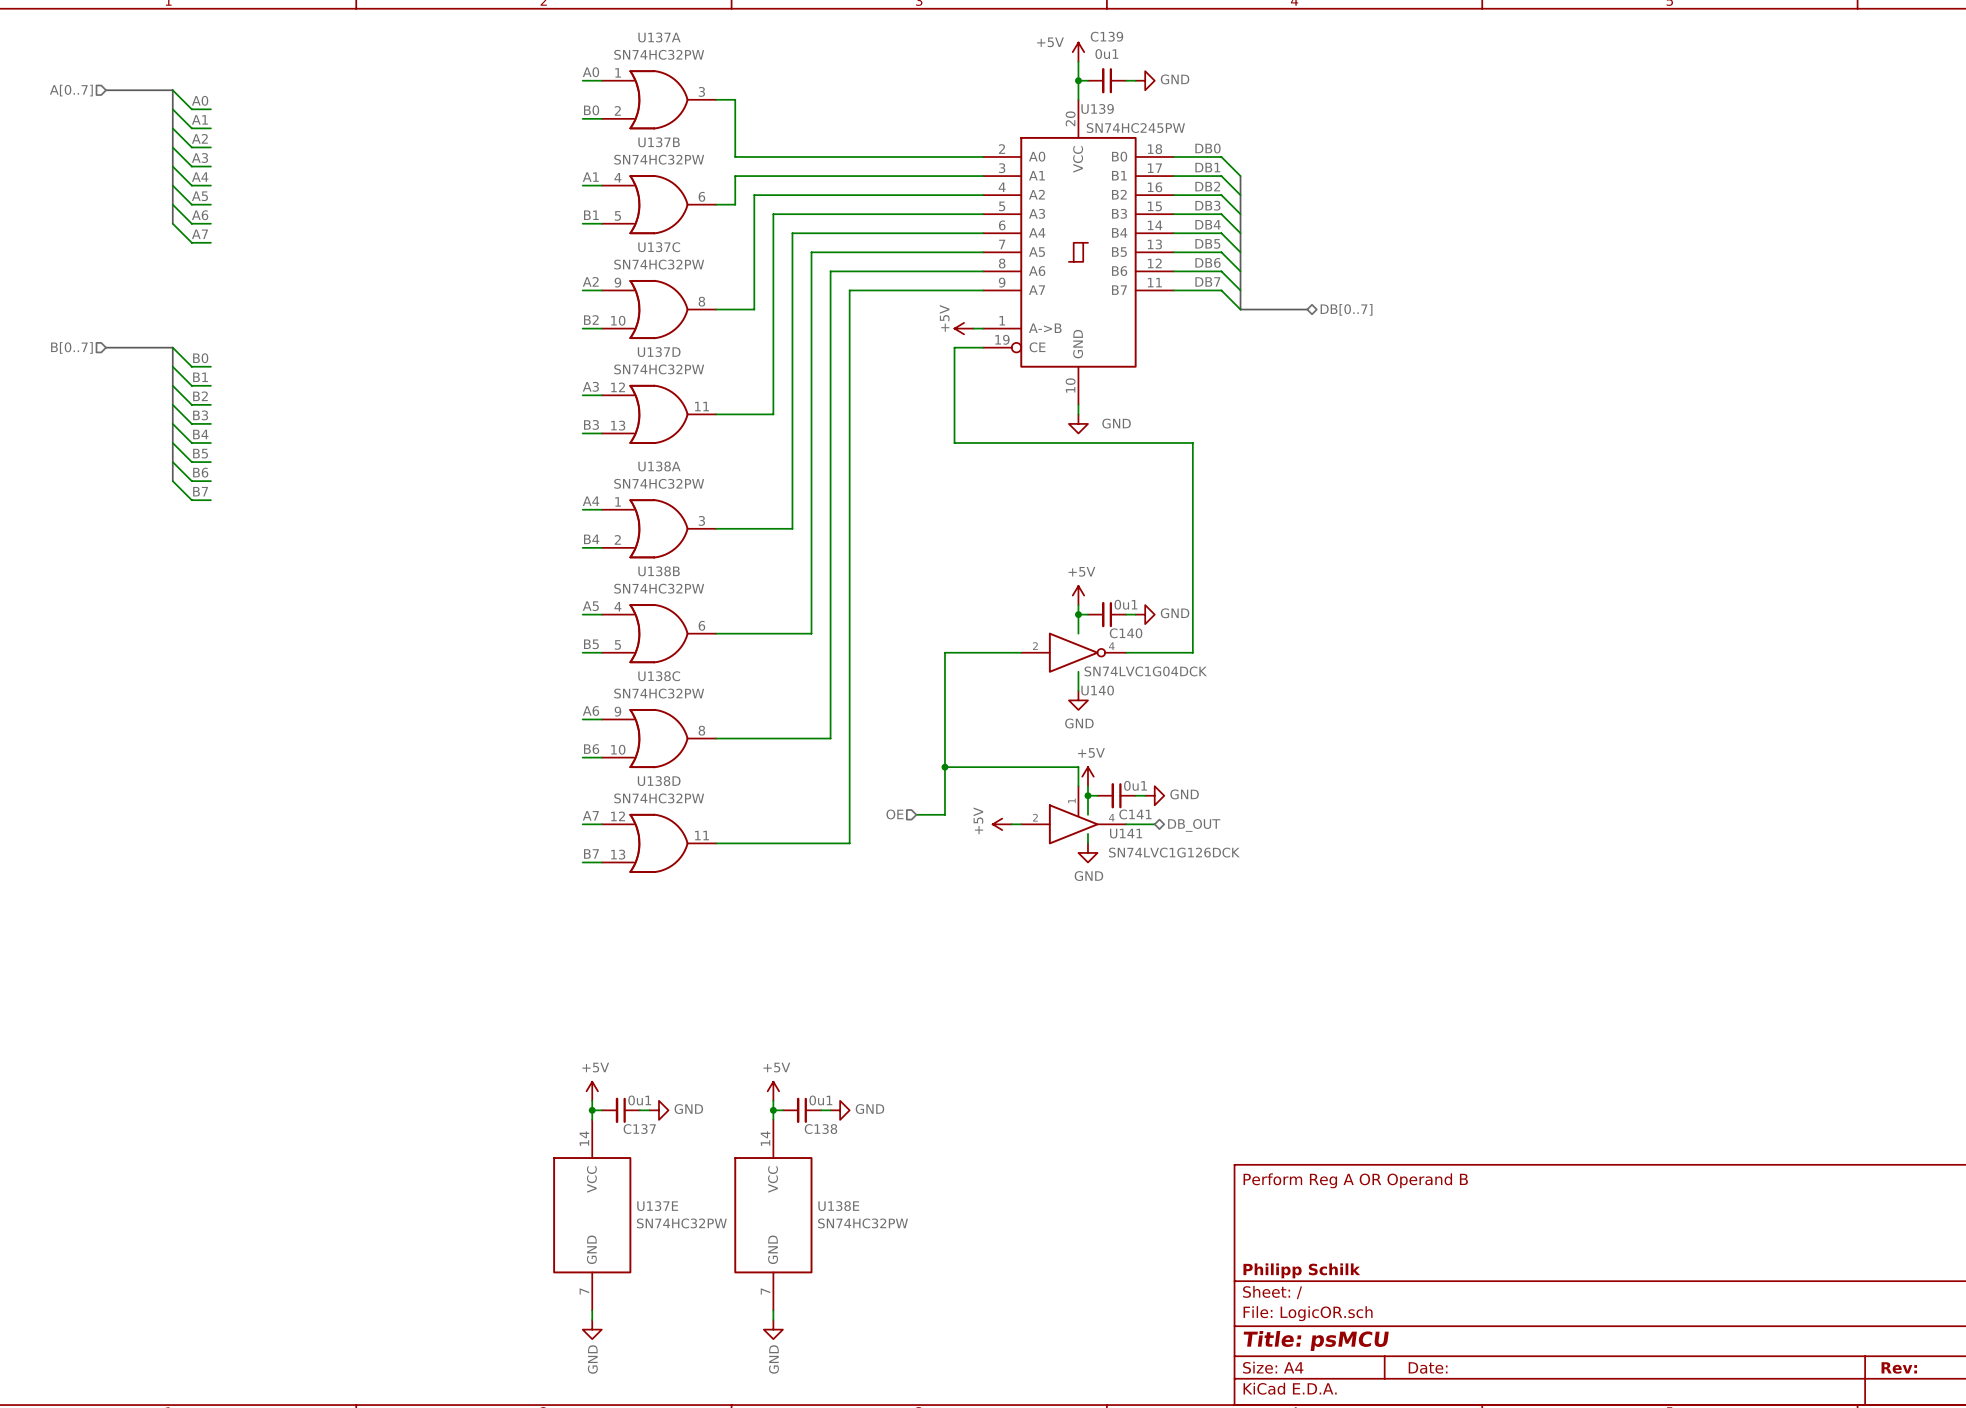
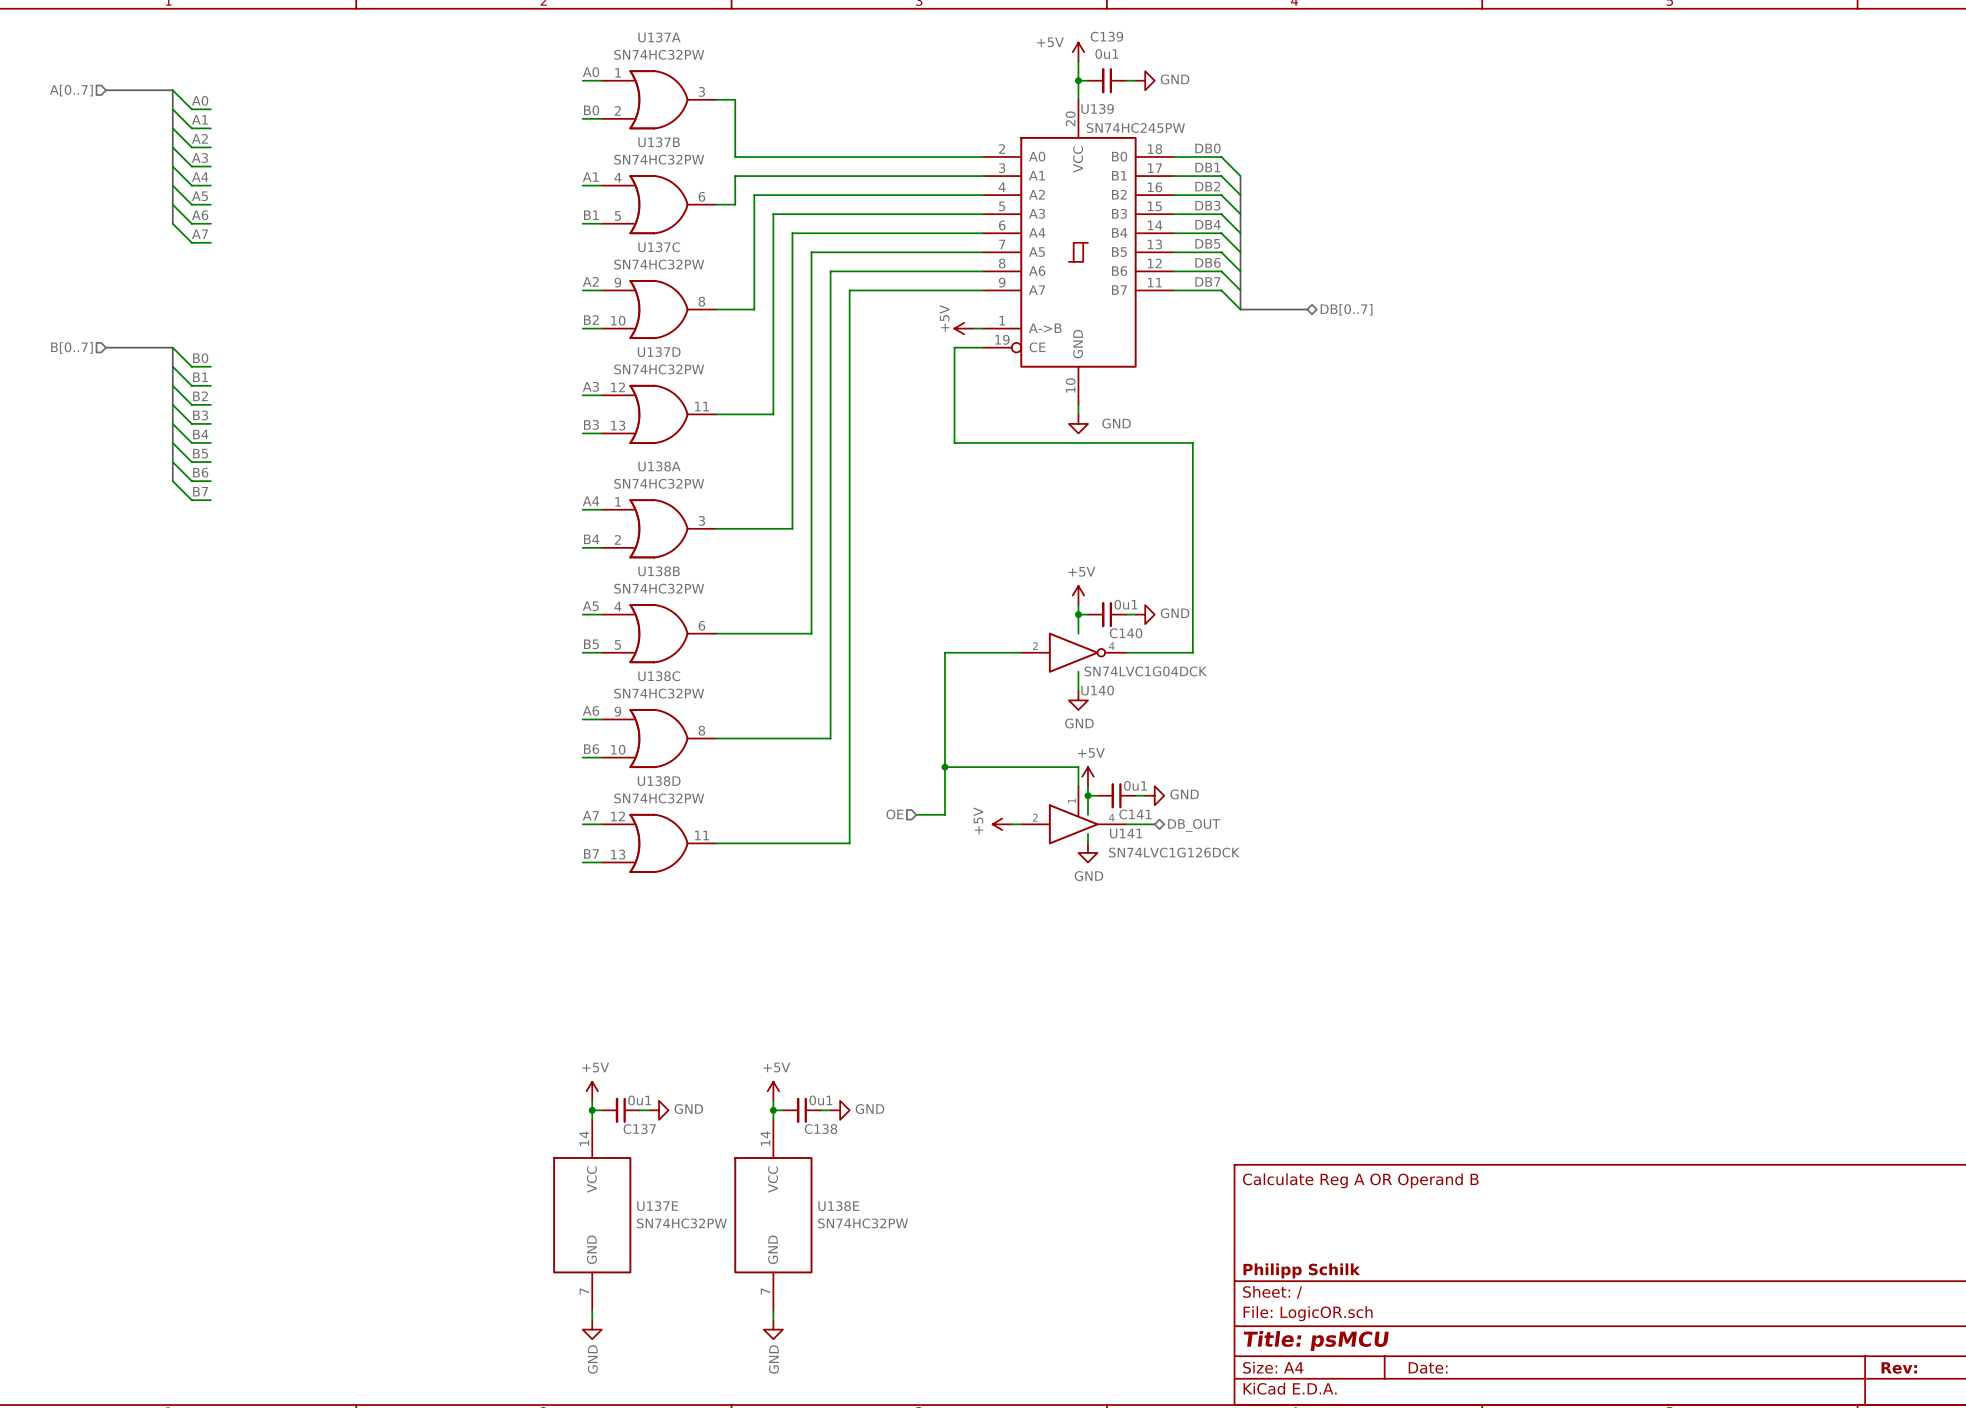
title block: Perform Reg A OR Operand B (1355, 1180) -> Calculate Reg A OR Operand B (1360, 1180)

